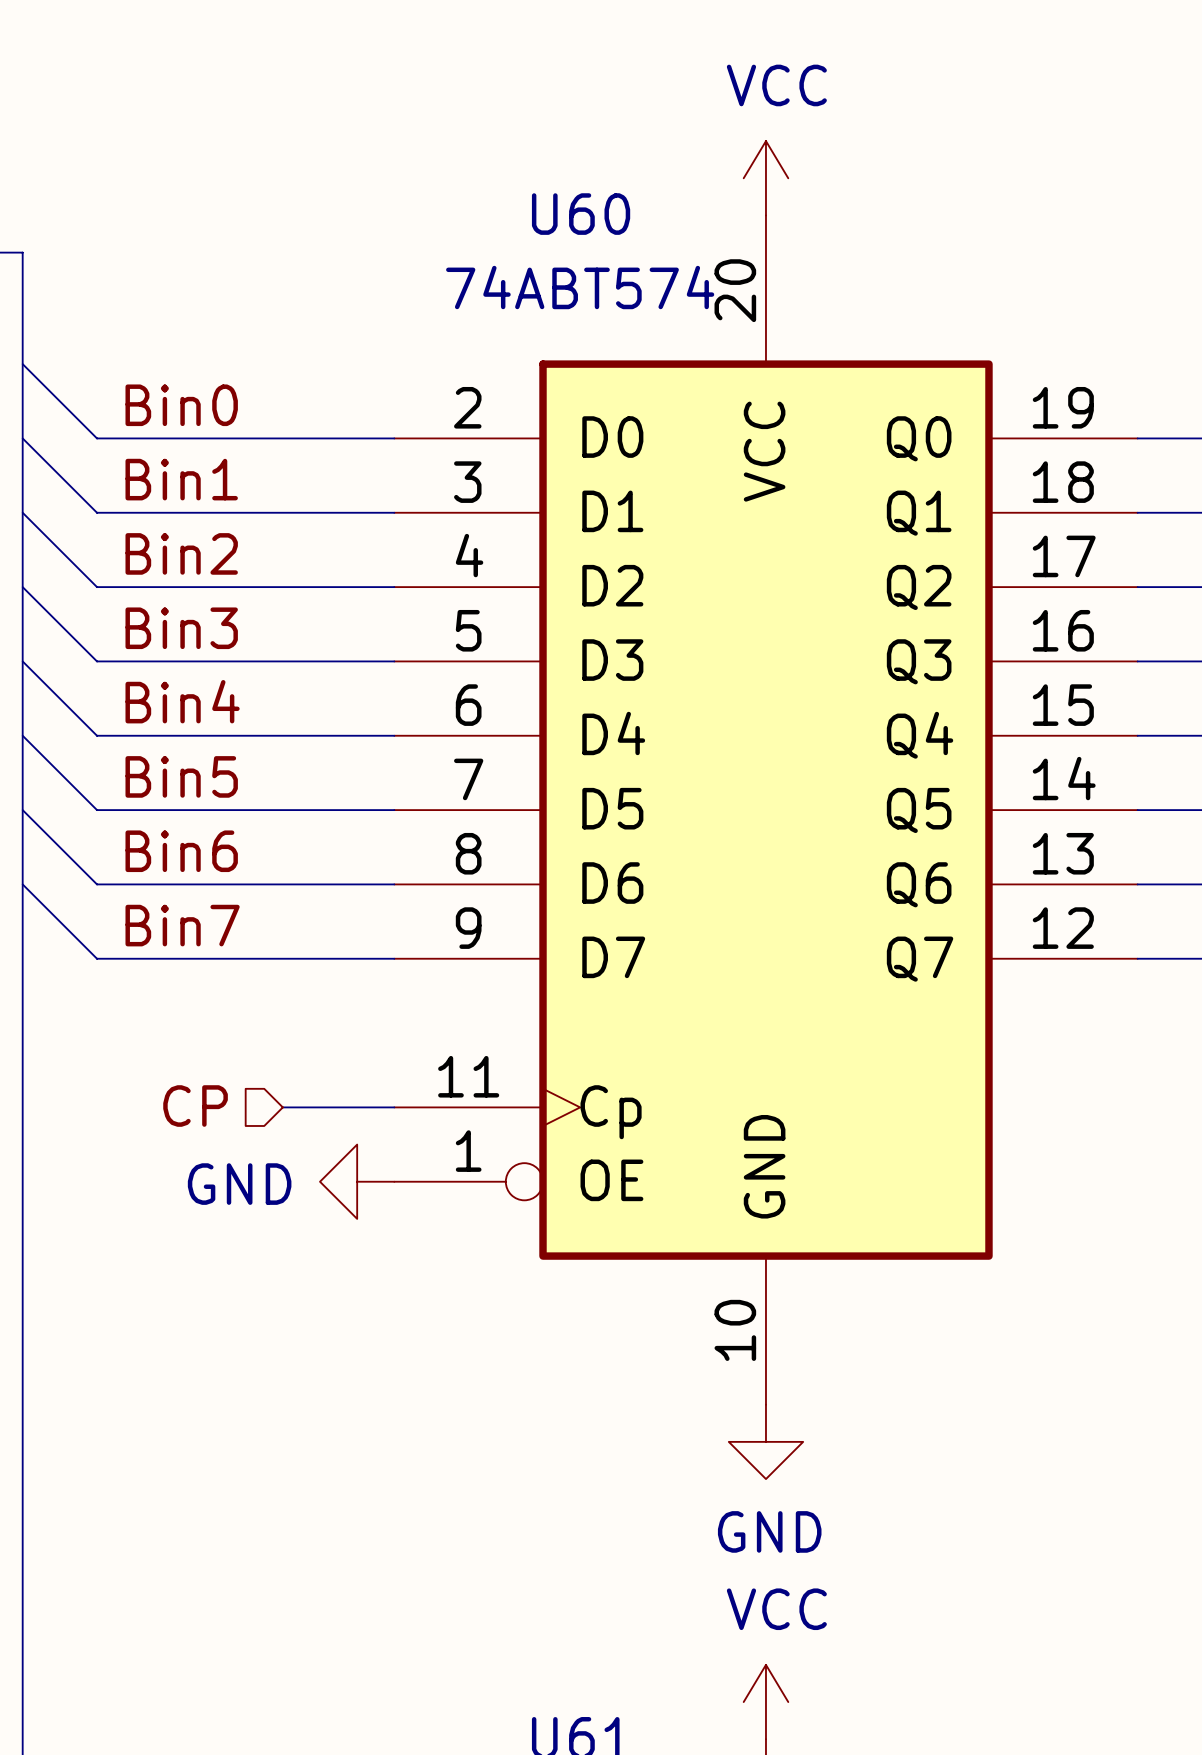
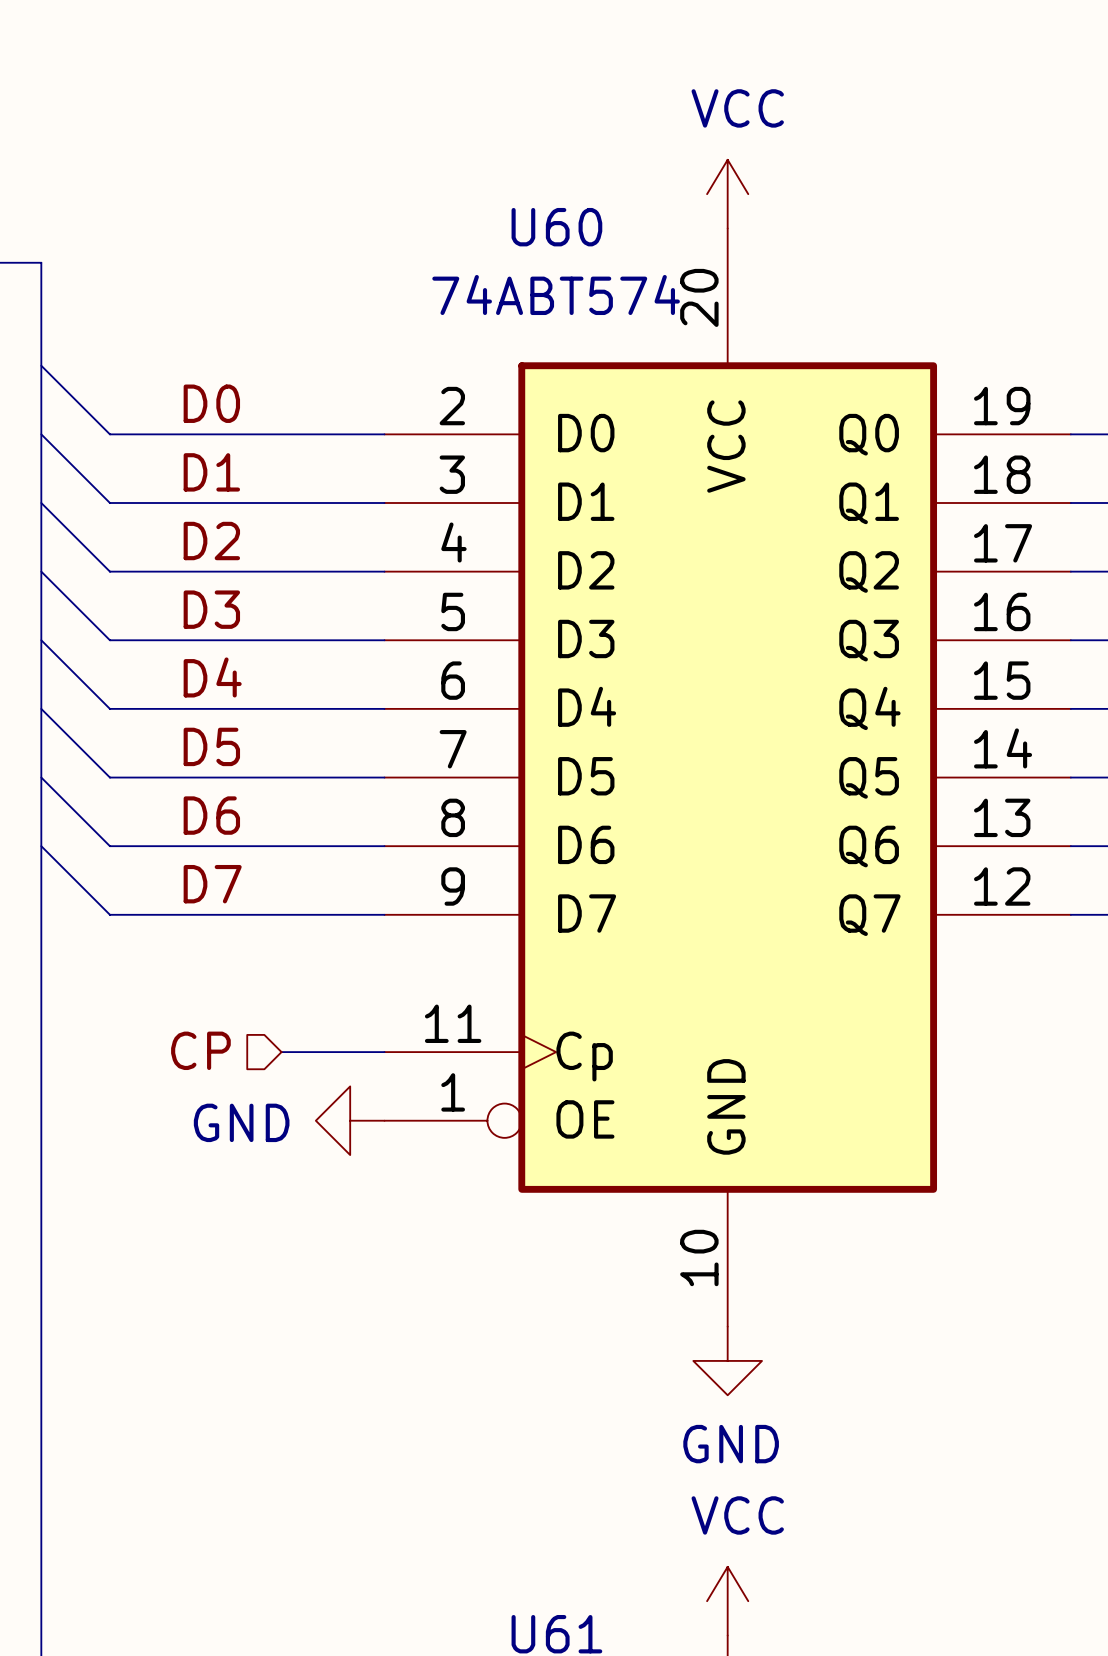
label: Bin0 (181, 405) -> D0 (211, 403)
label: Bin1 (181, 479) -> D1 (211, 472)
label: Bin2 (181, 553) -> D2 (211, 541)
label: Bin3 (181, 628) -> D3 (211, 609)
label: Bin4 (182, 701) -> D4 (212, 677)
label: Bin5 (181, 776) -> D5 (211, 746)
label: Bin6 (181, 851) -> D6 (211, 815)
label: Bin7 (182, 925) -> D7 (212, 884)

